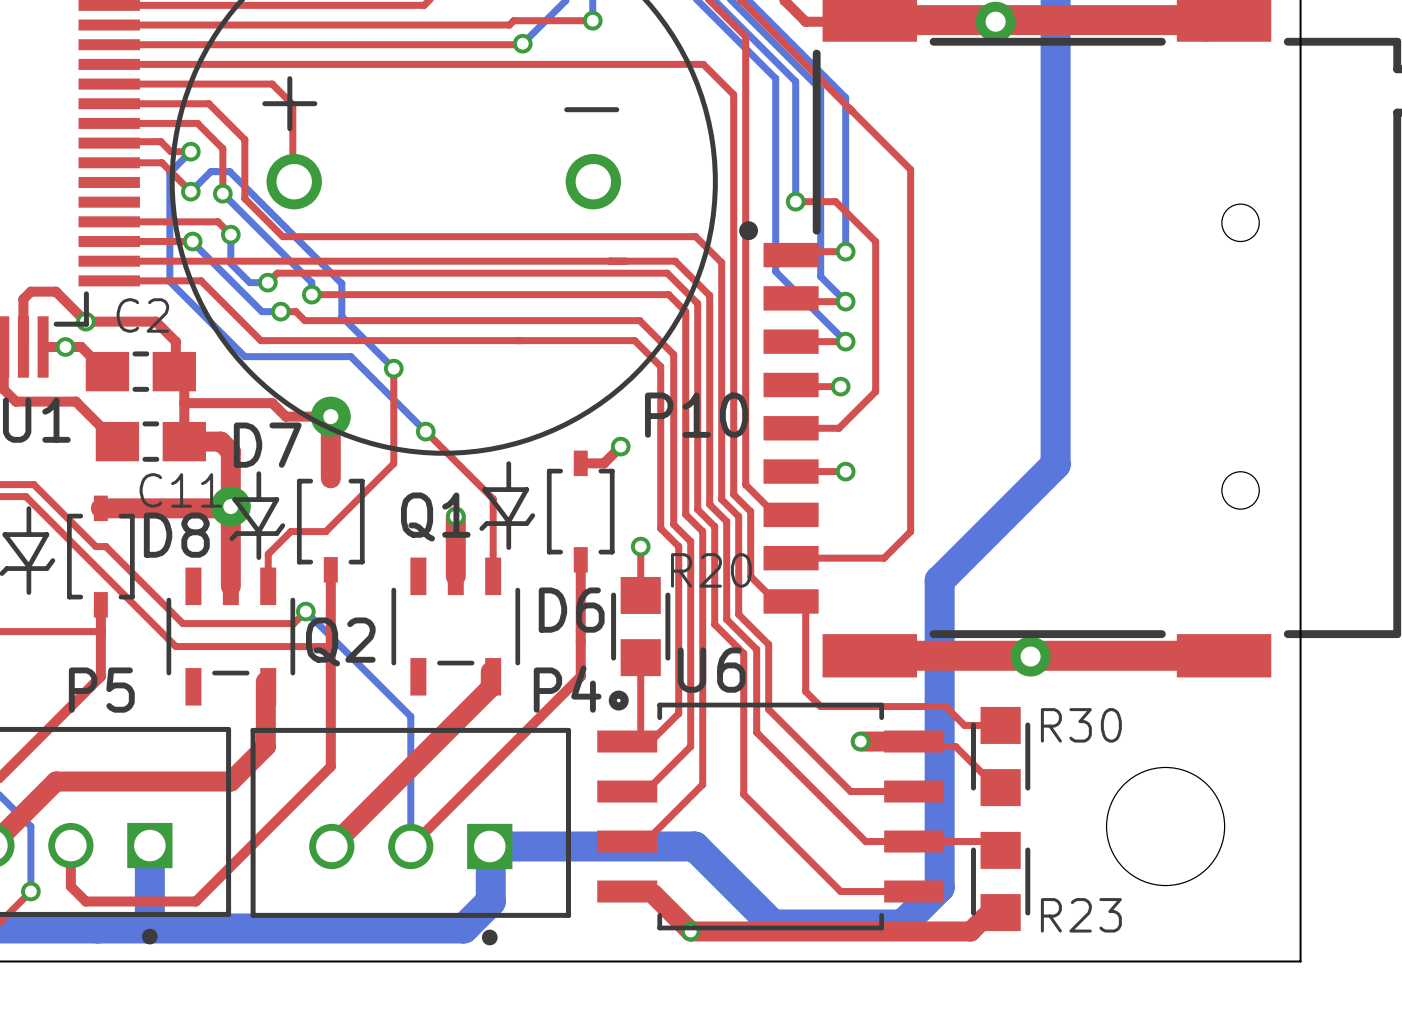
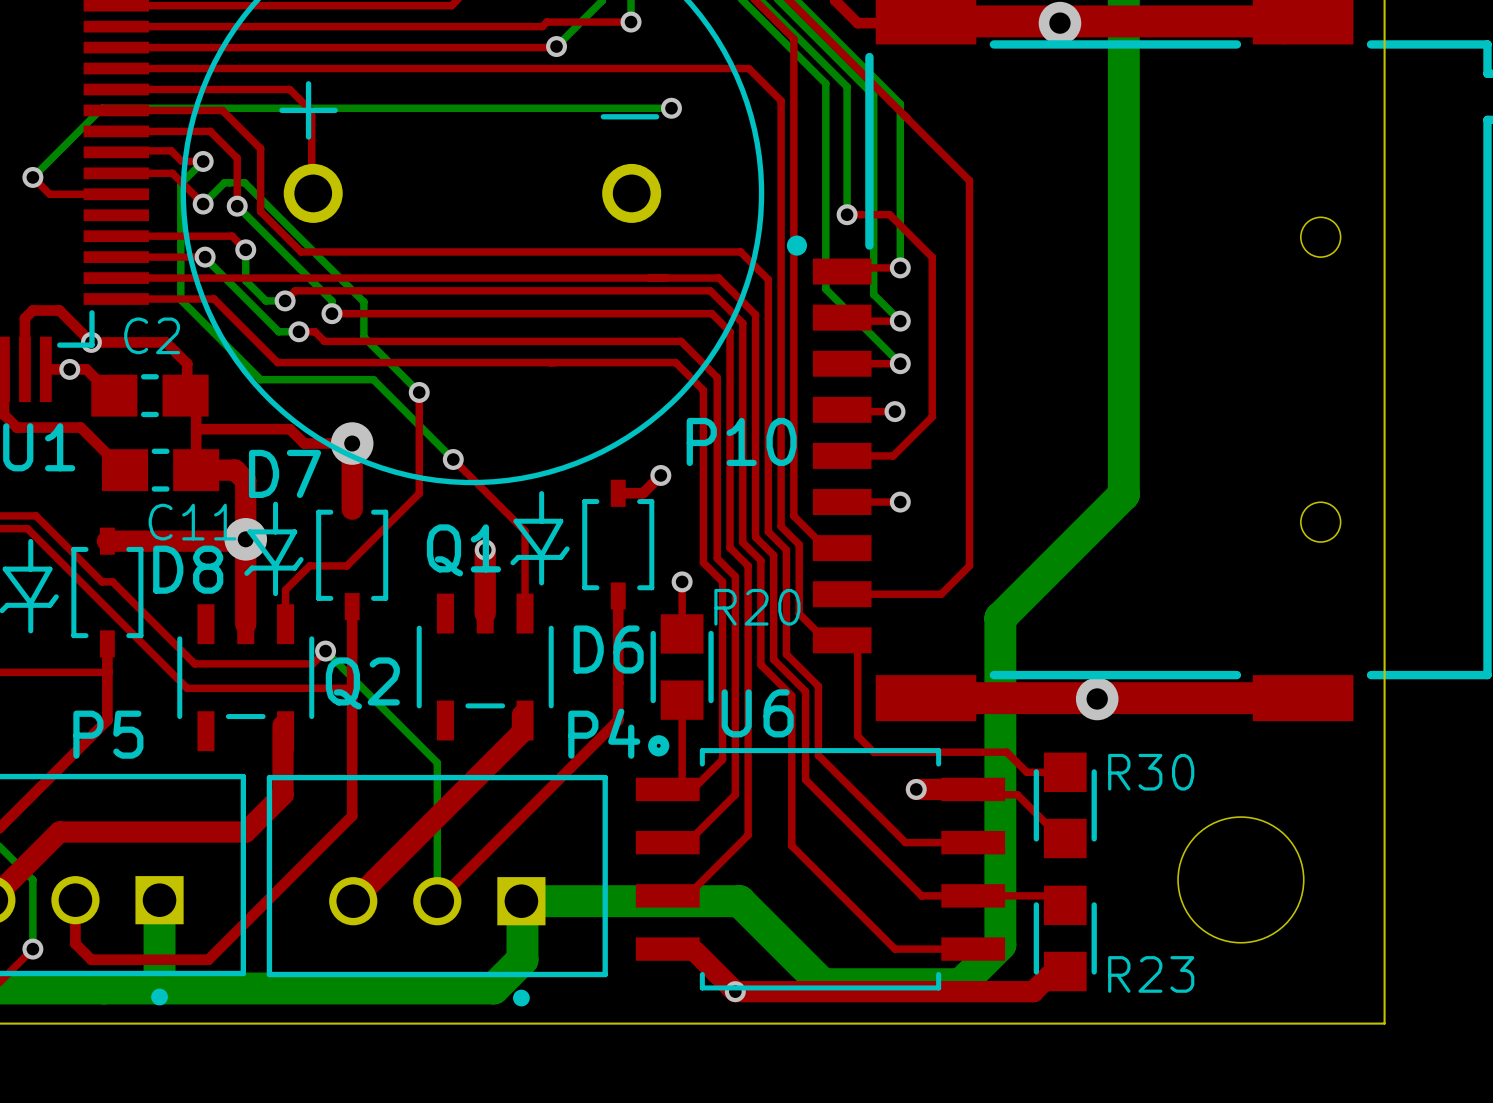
bottom track: none -> (671, 108) (102, 108) (32, 177)
via: none -> (671, 108)
top track: none -> (32, 177) (49, 194) (116, 194)
via: none -> (32, 177)

